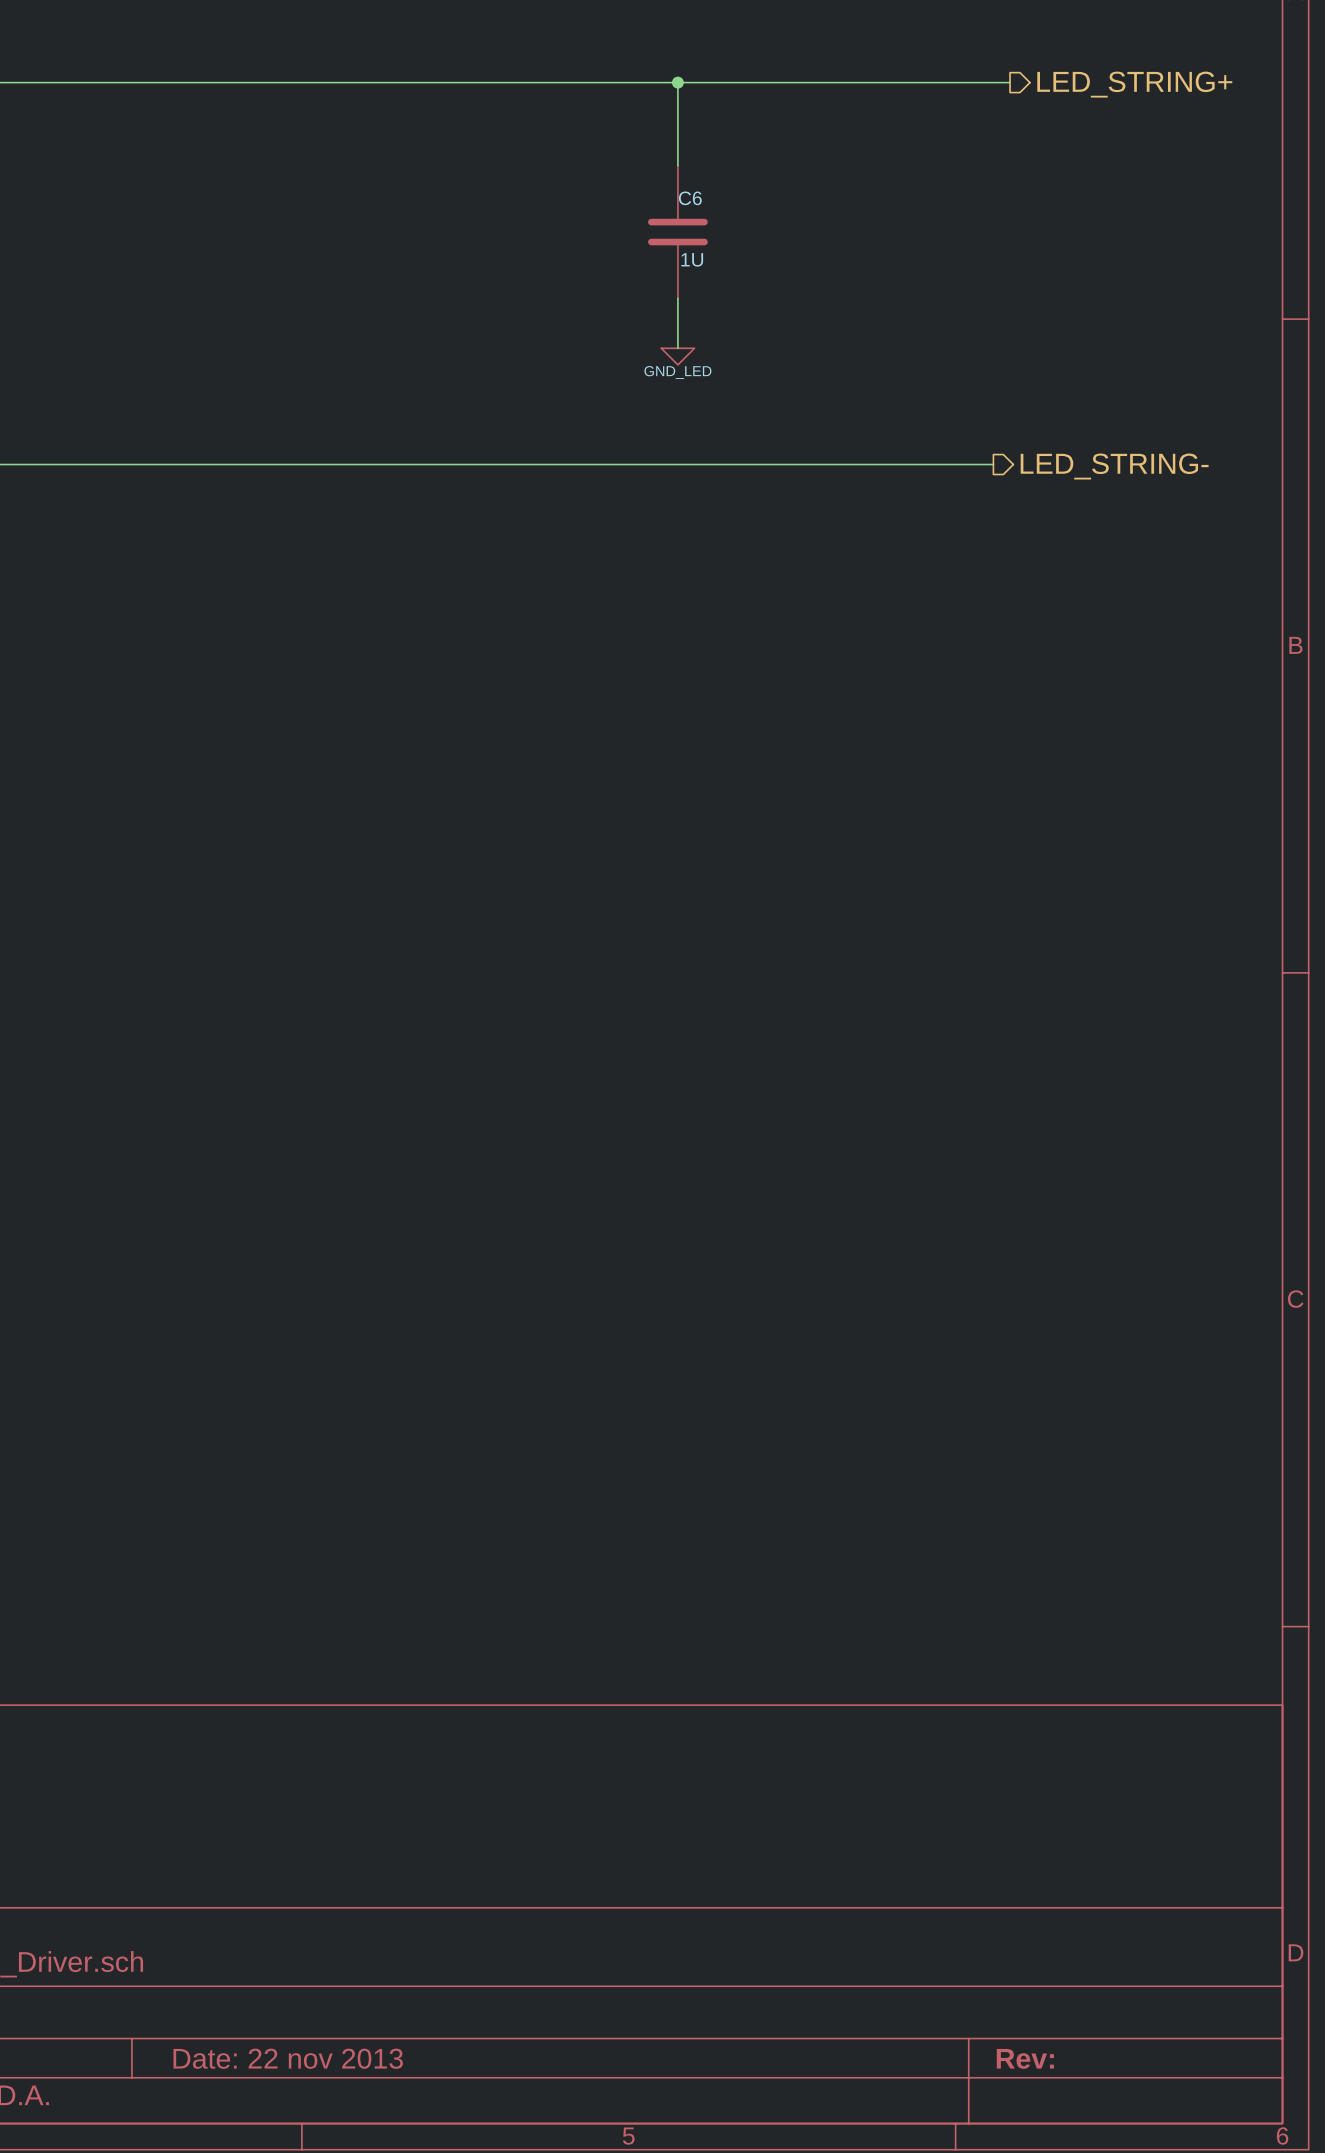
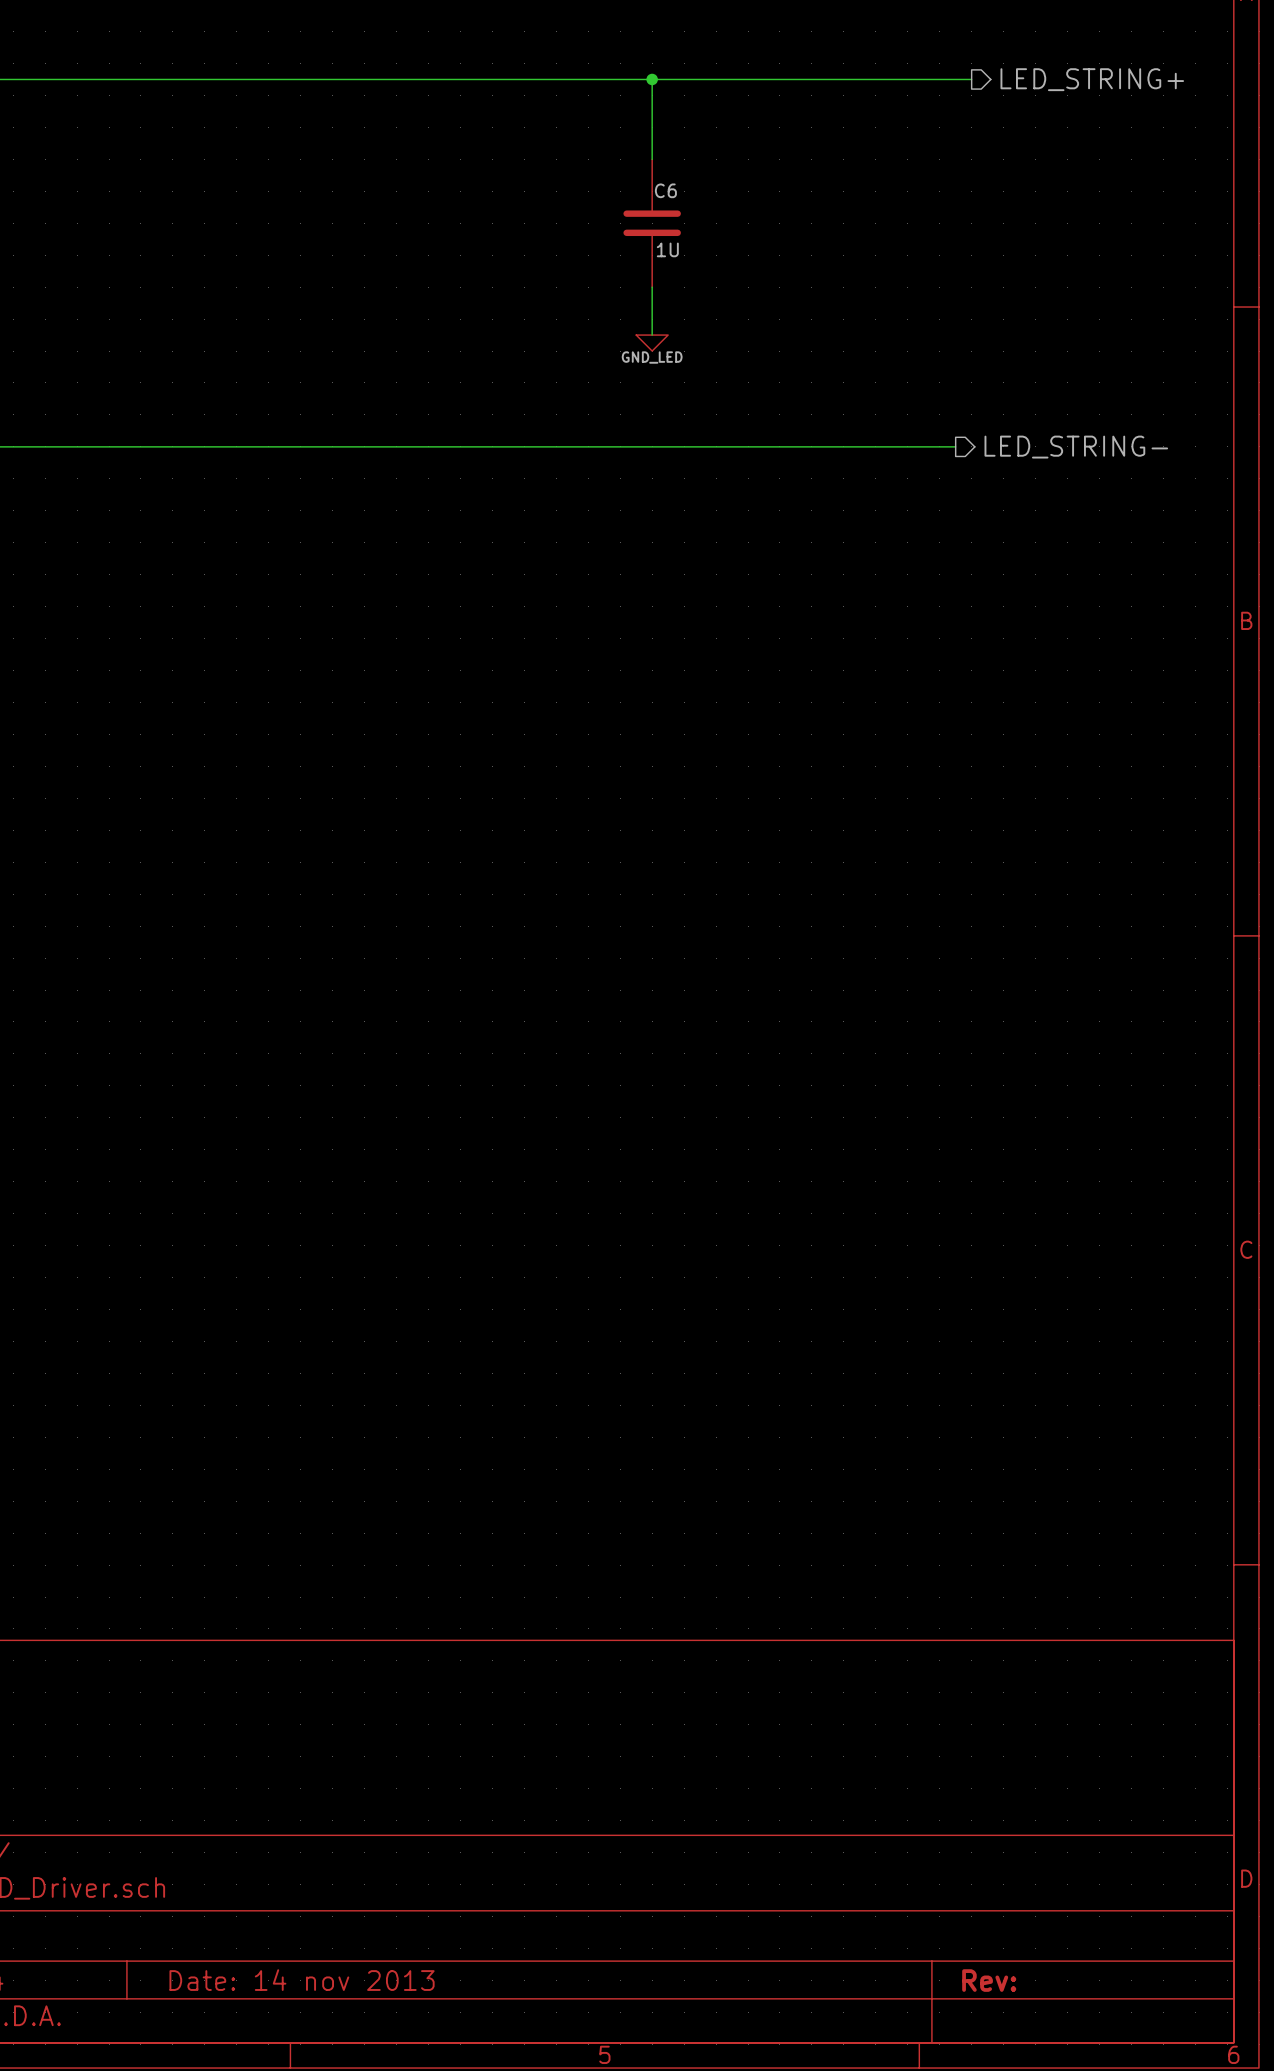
title block: Date: 22 nov 2013 (288, 2058) -> Date: 14 nov 2013 (302, 1980)

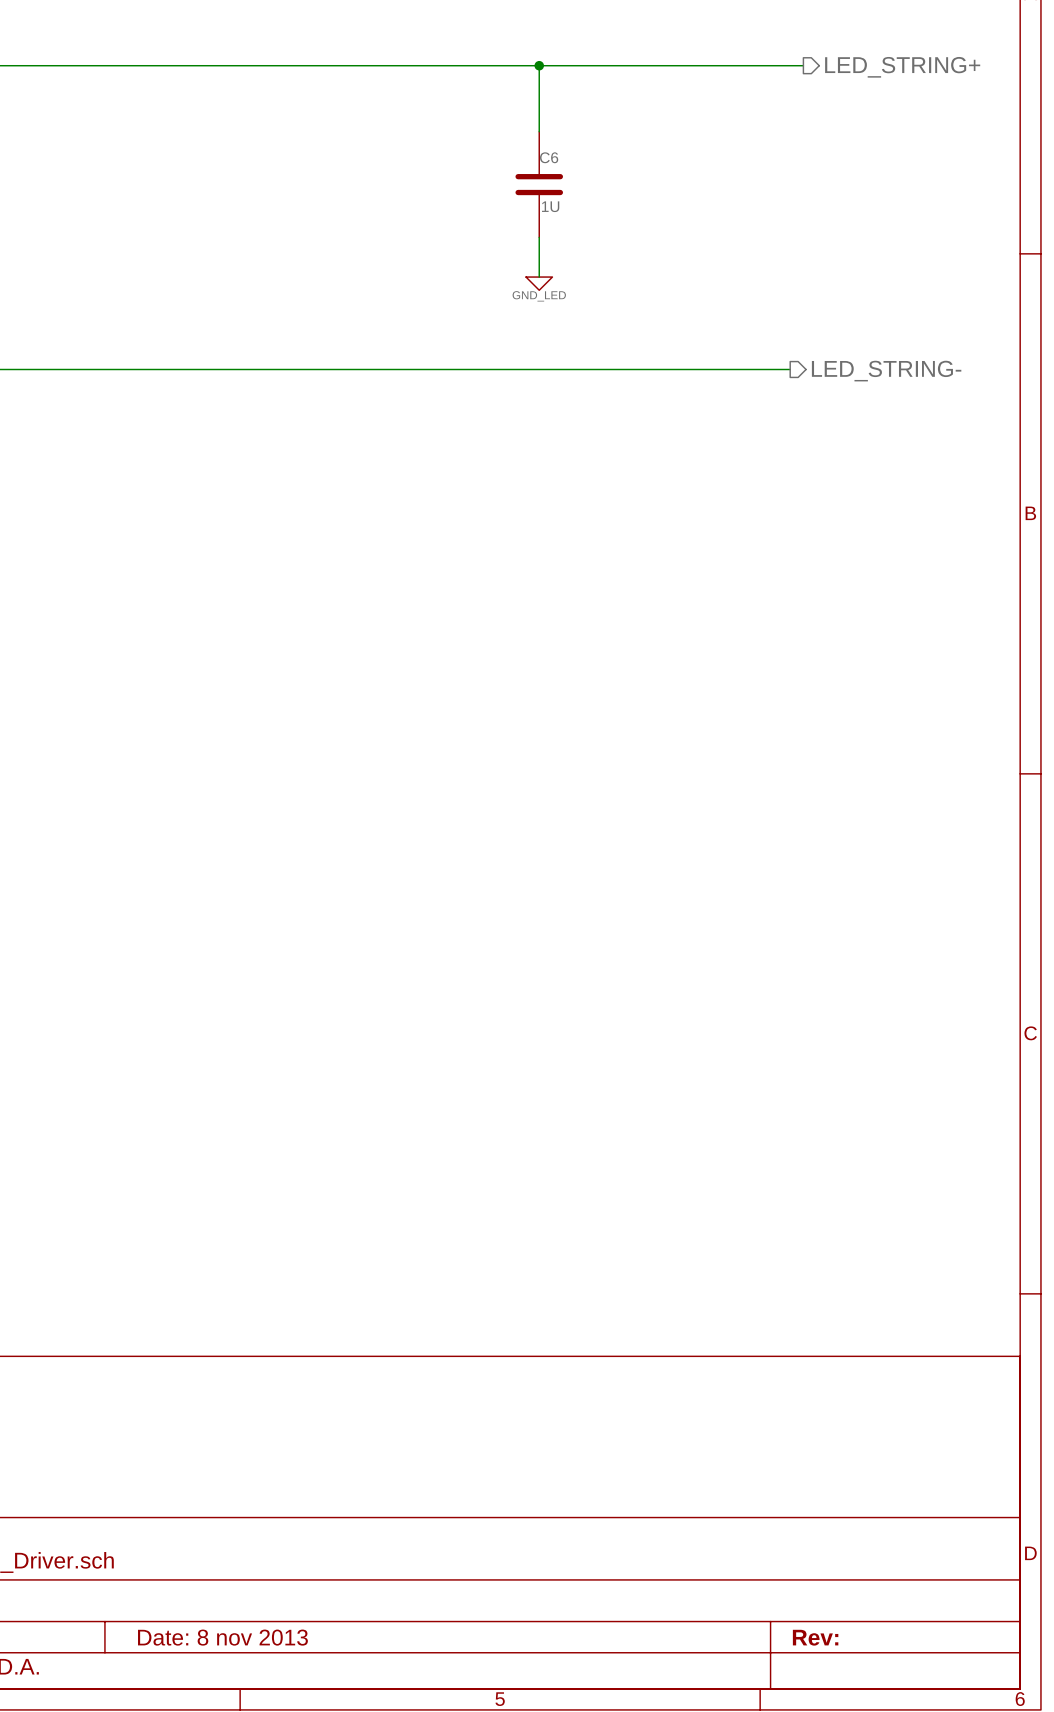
title block: Date: 14 nov 2013 (302, 1980) -> Date: 8 nov 2013 (222, 1637)

